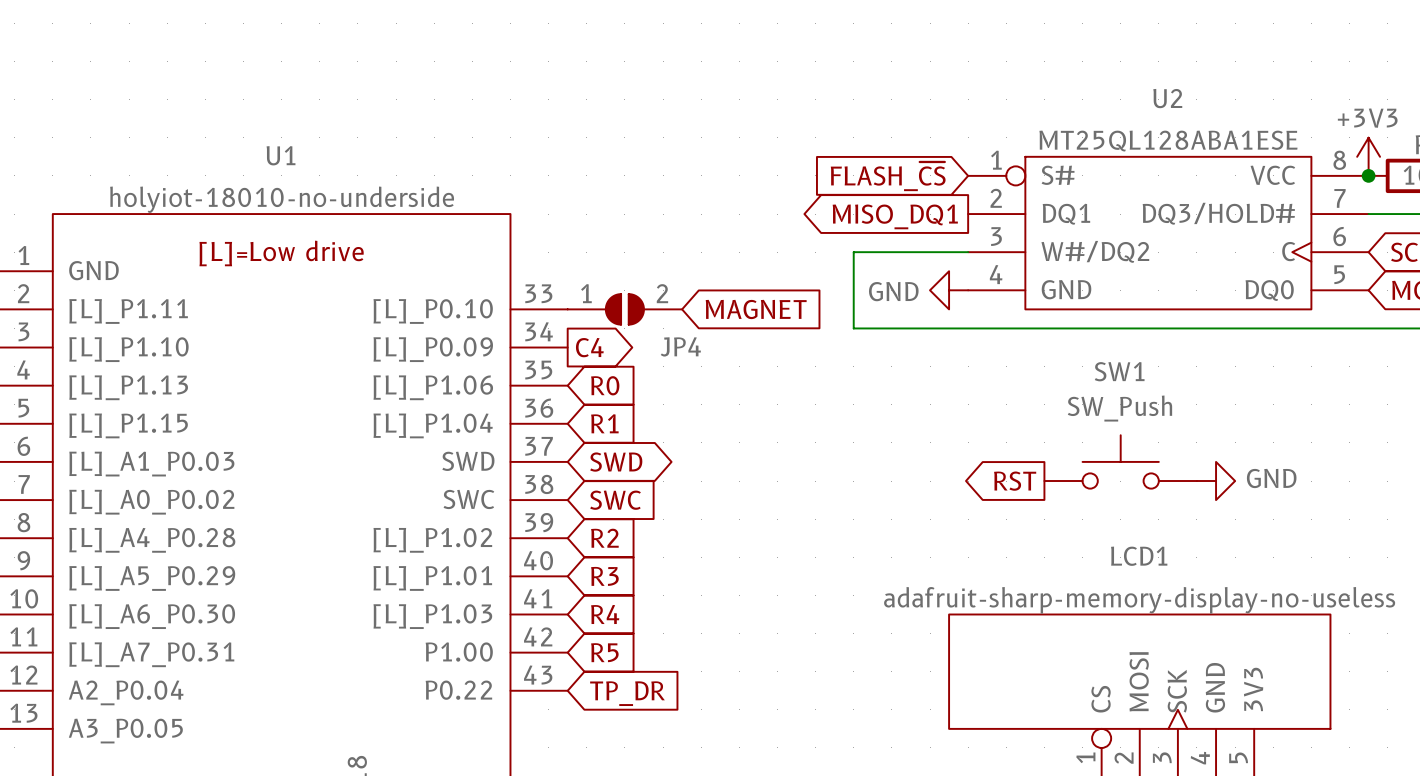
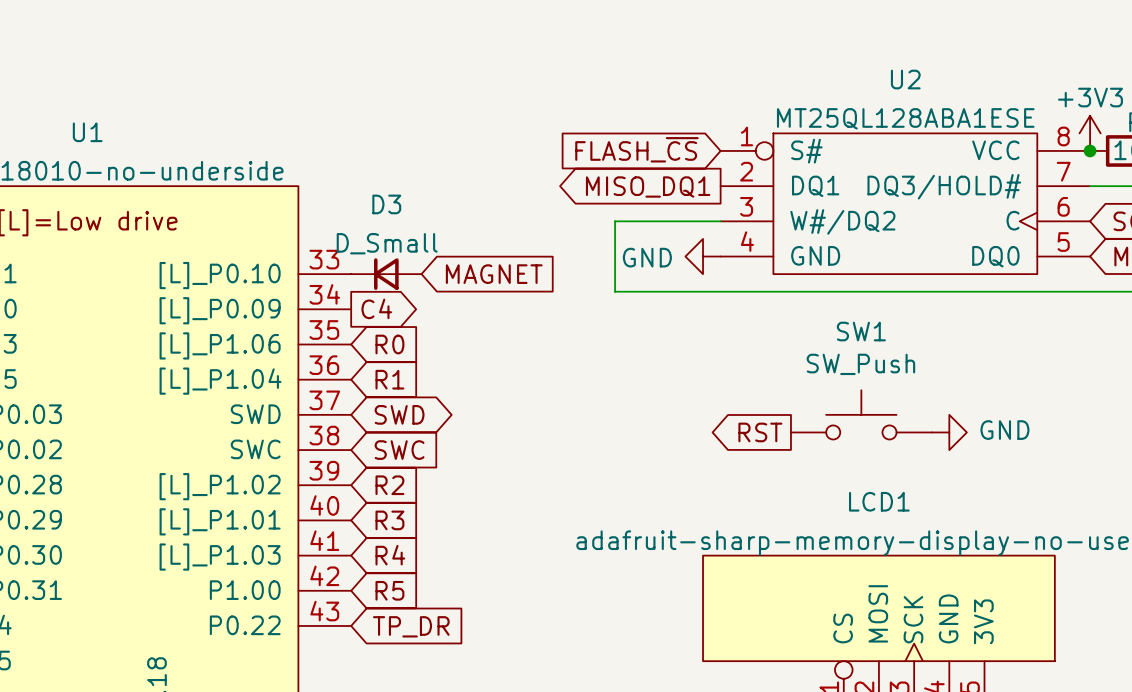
D3: none -> D_Small (386, 274)
JP4: (624, 309) -> none
global label position: MAGNET (756, 309) -> MAGNET (494, 274)

